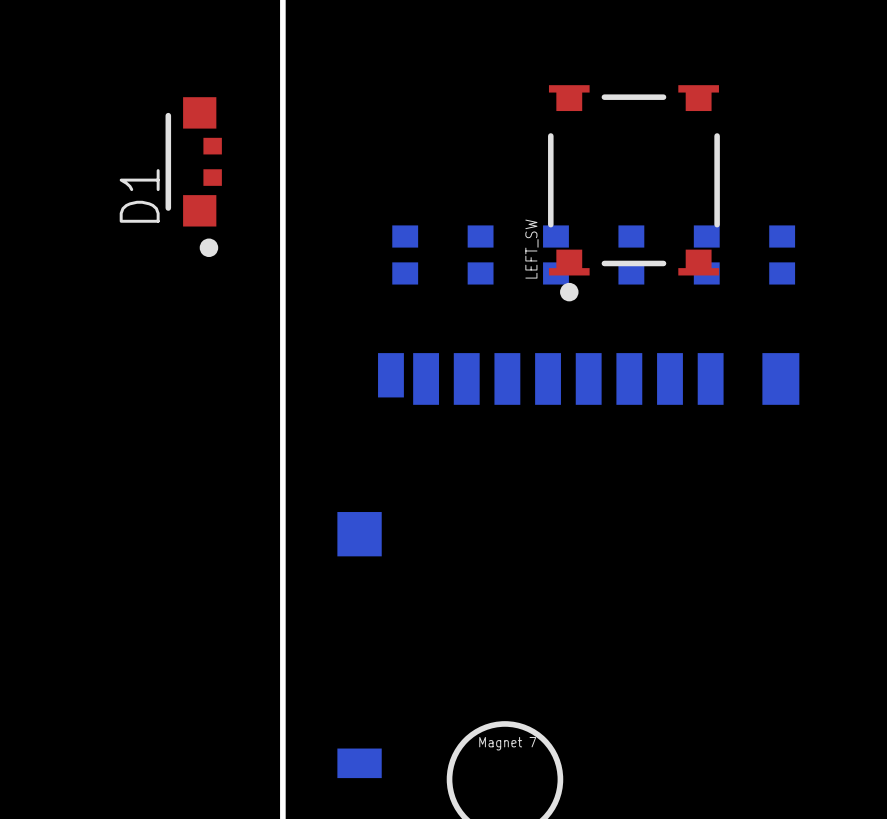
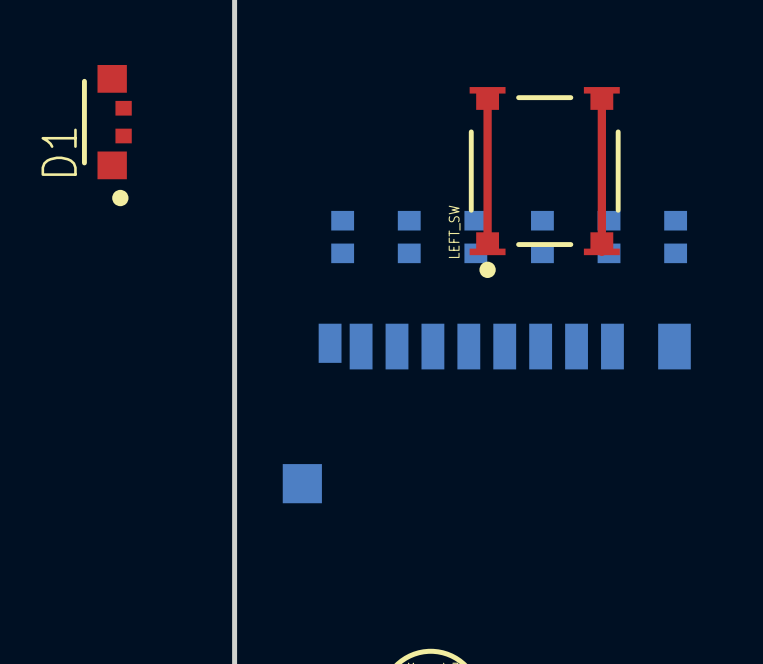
top track: none -> (487, 101) (487, 240)
top track: none -> (601, 101) (601, 251)
D1 position: (193, 177) -> (106, 135)

